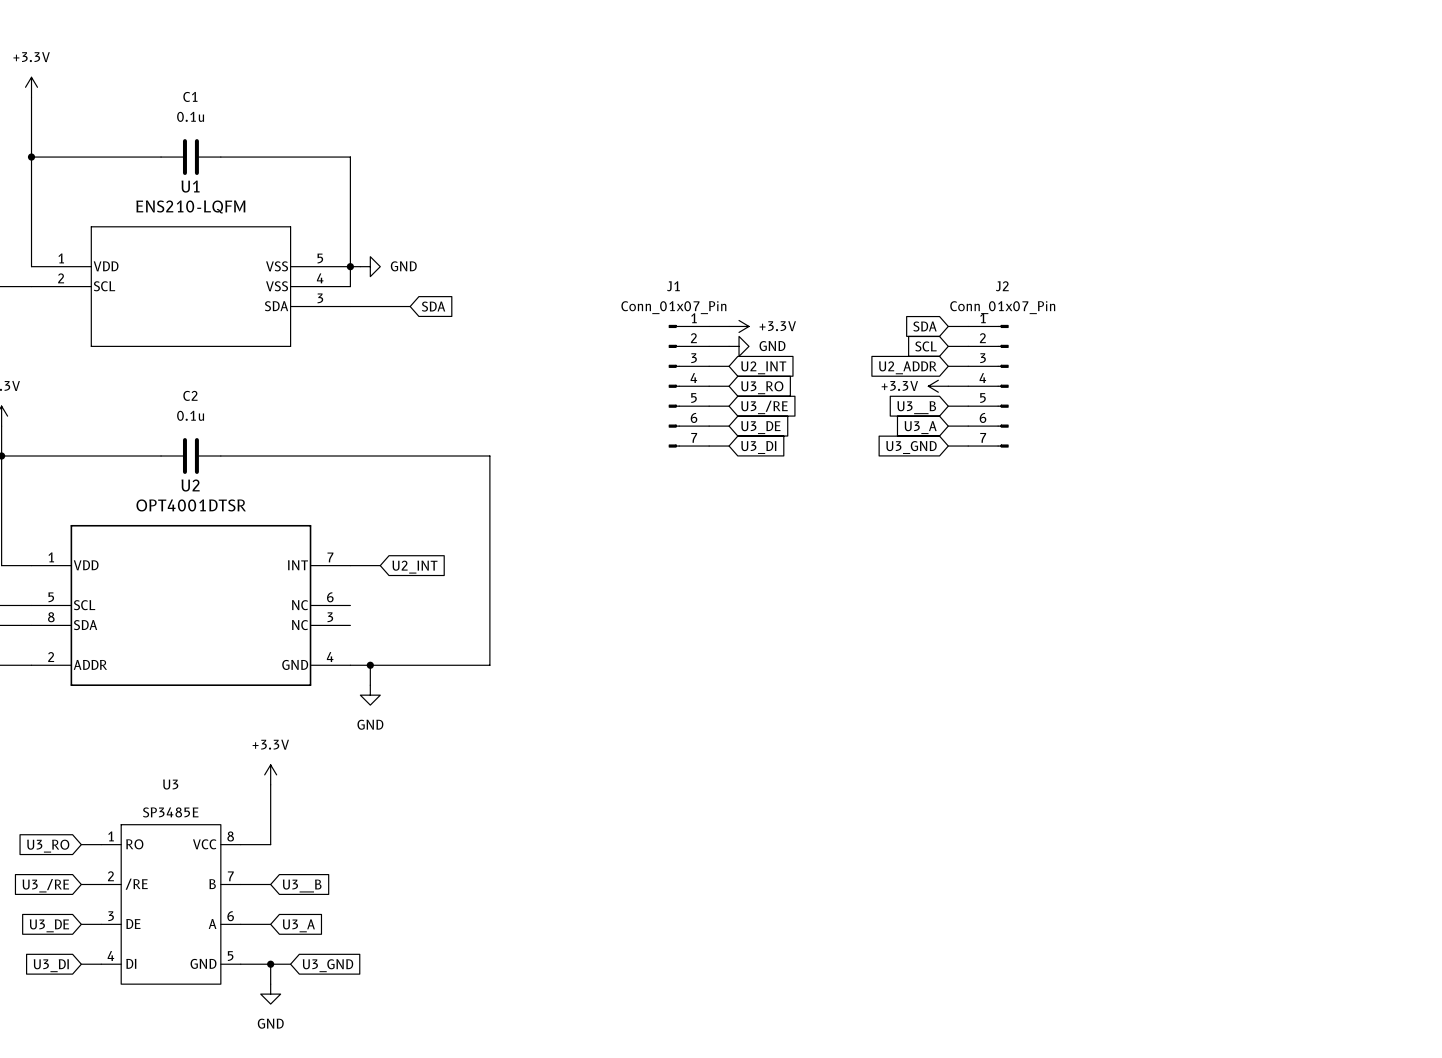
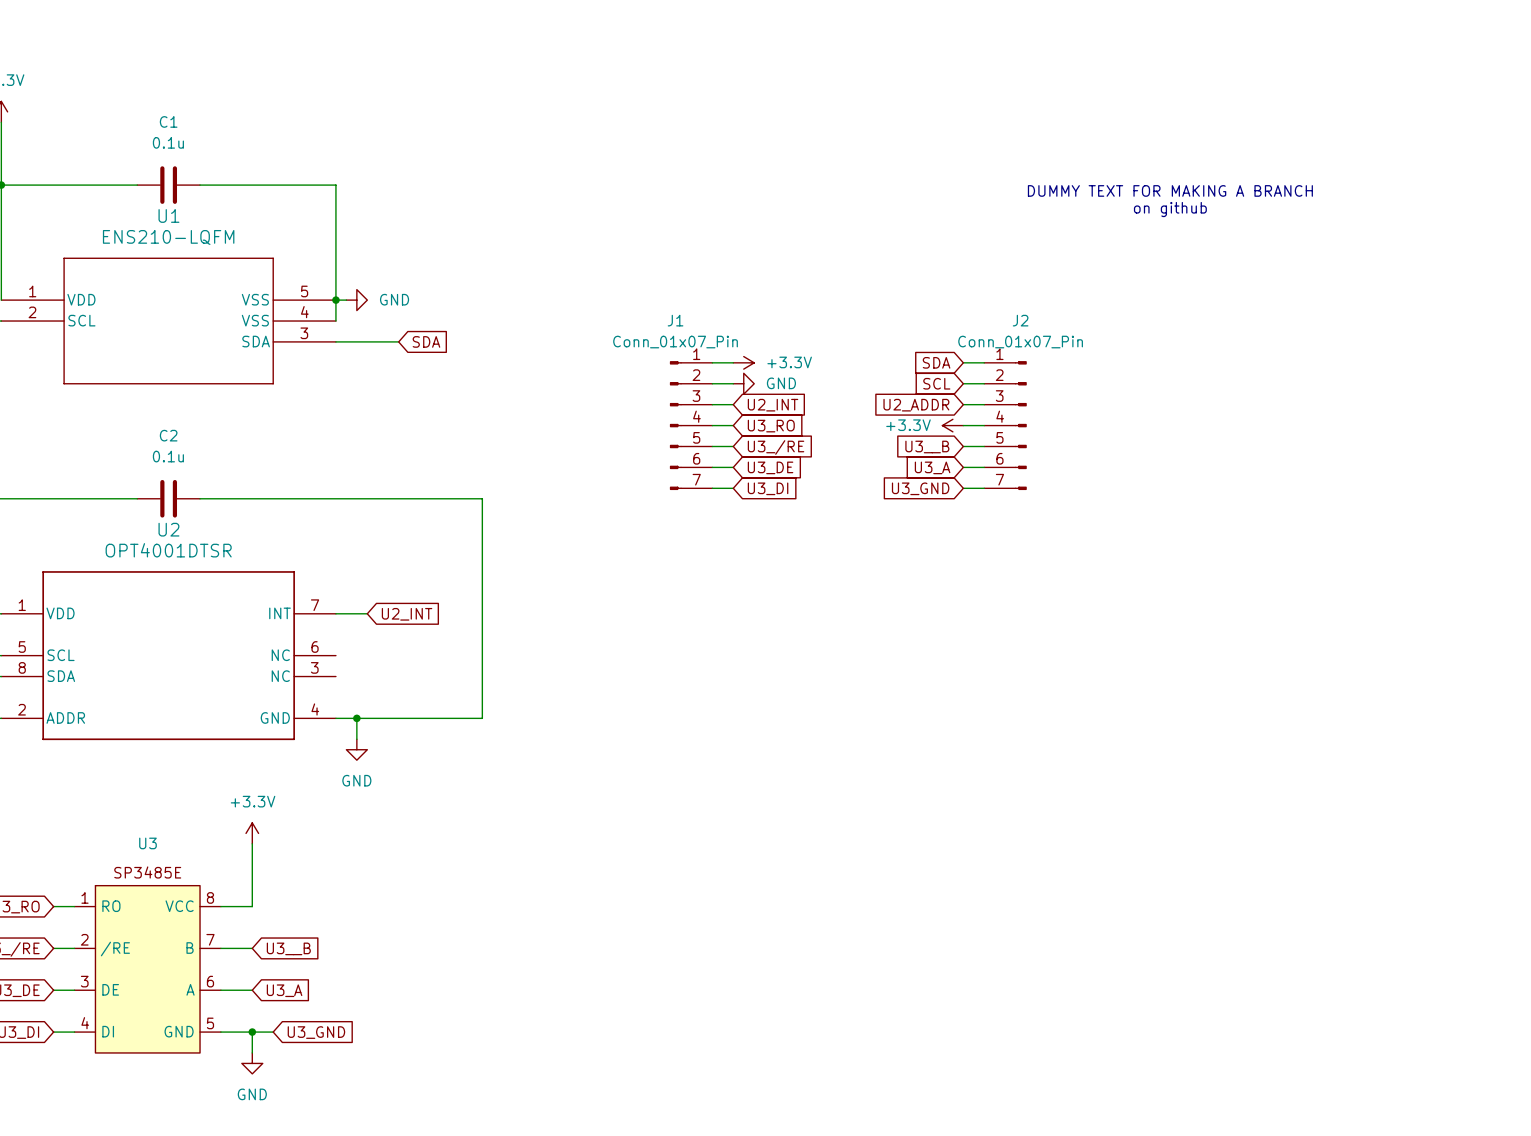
text: none -> DUMMY TEXT FOR MAKING A BRANCH (1170, 190)
text: none -> on github (1170, 209)

